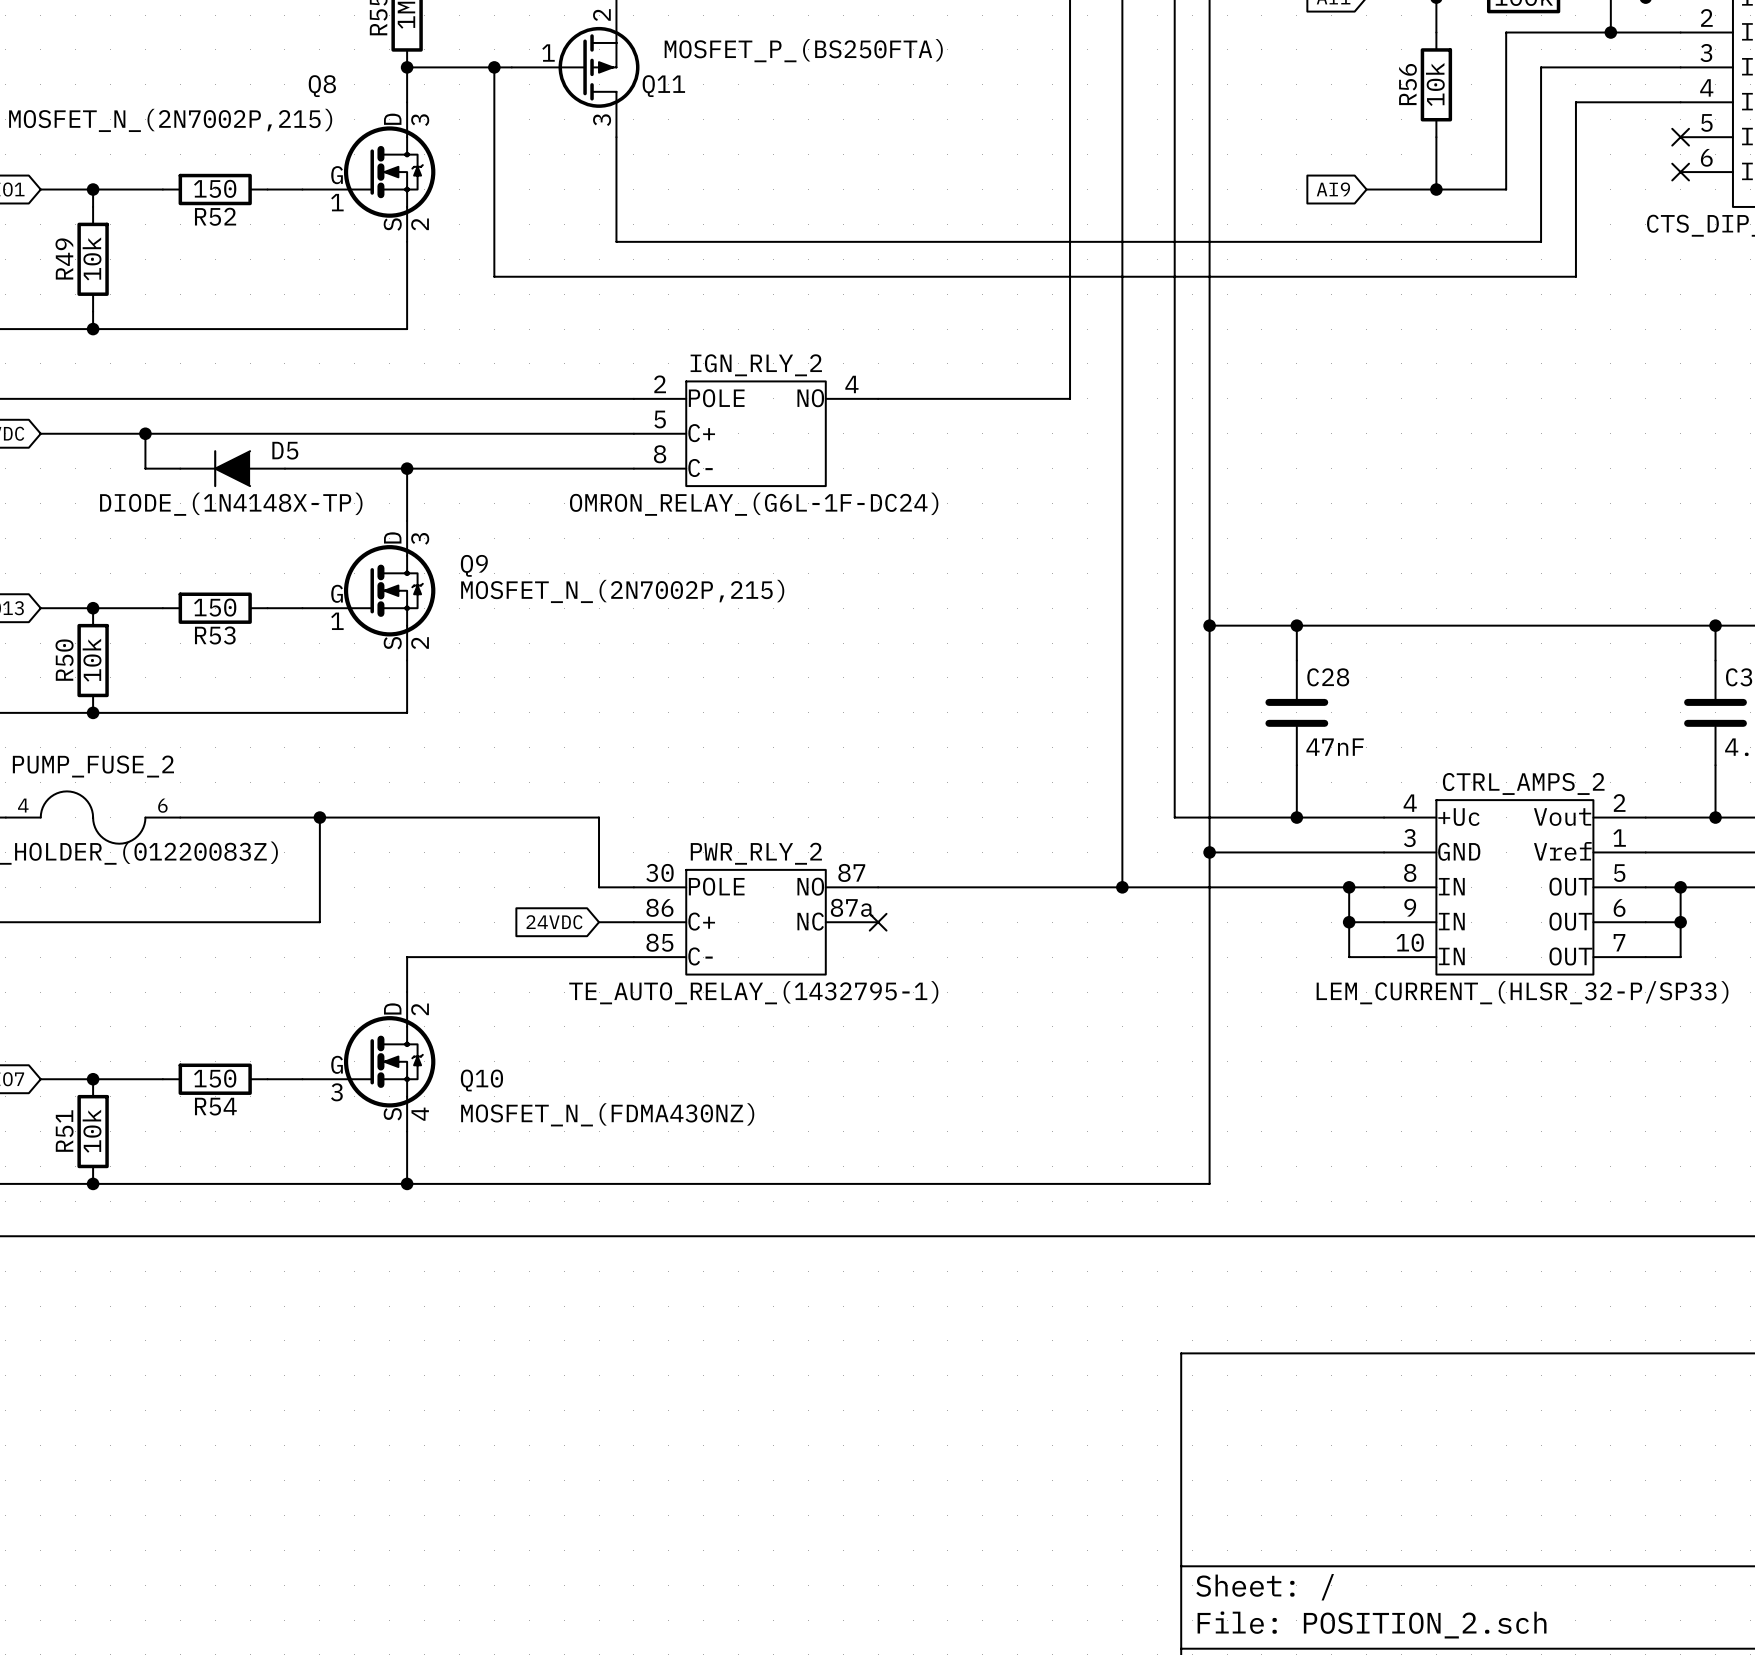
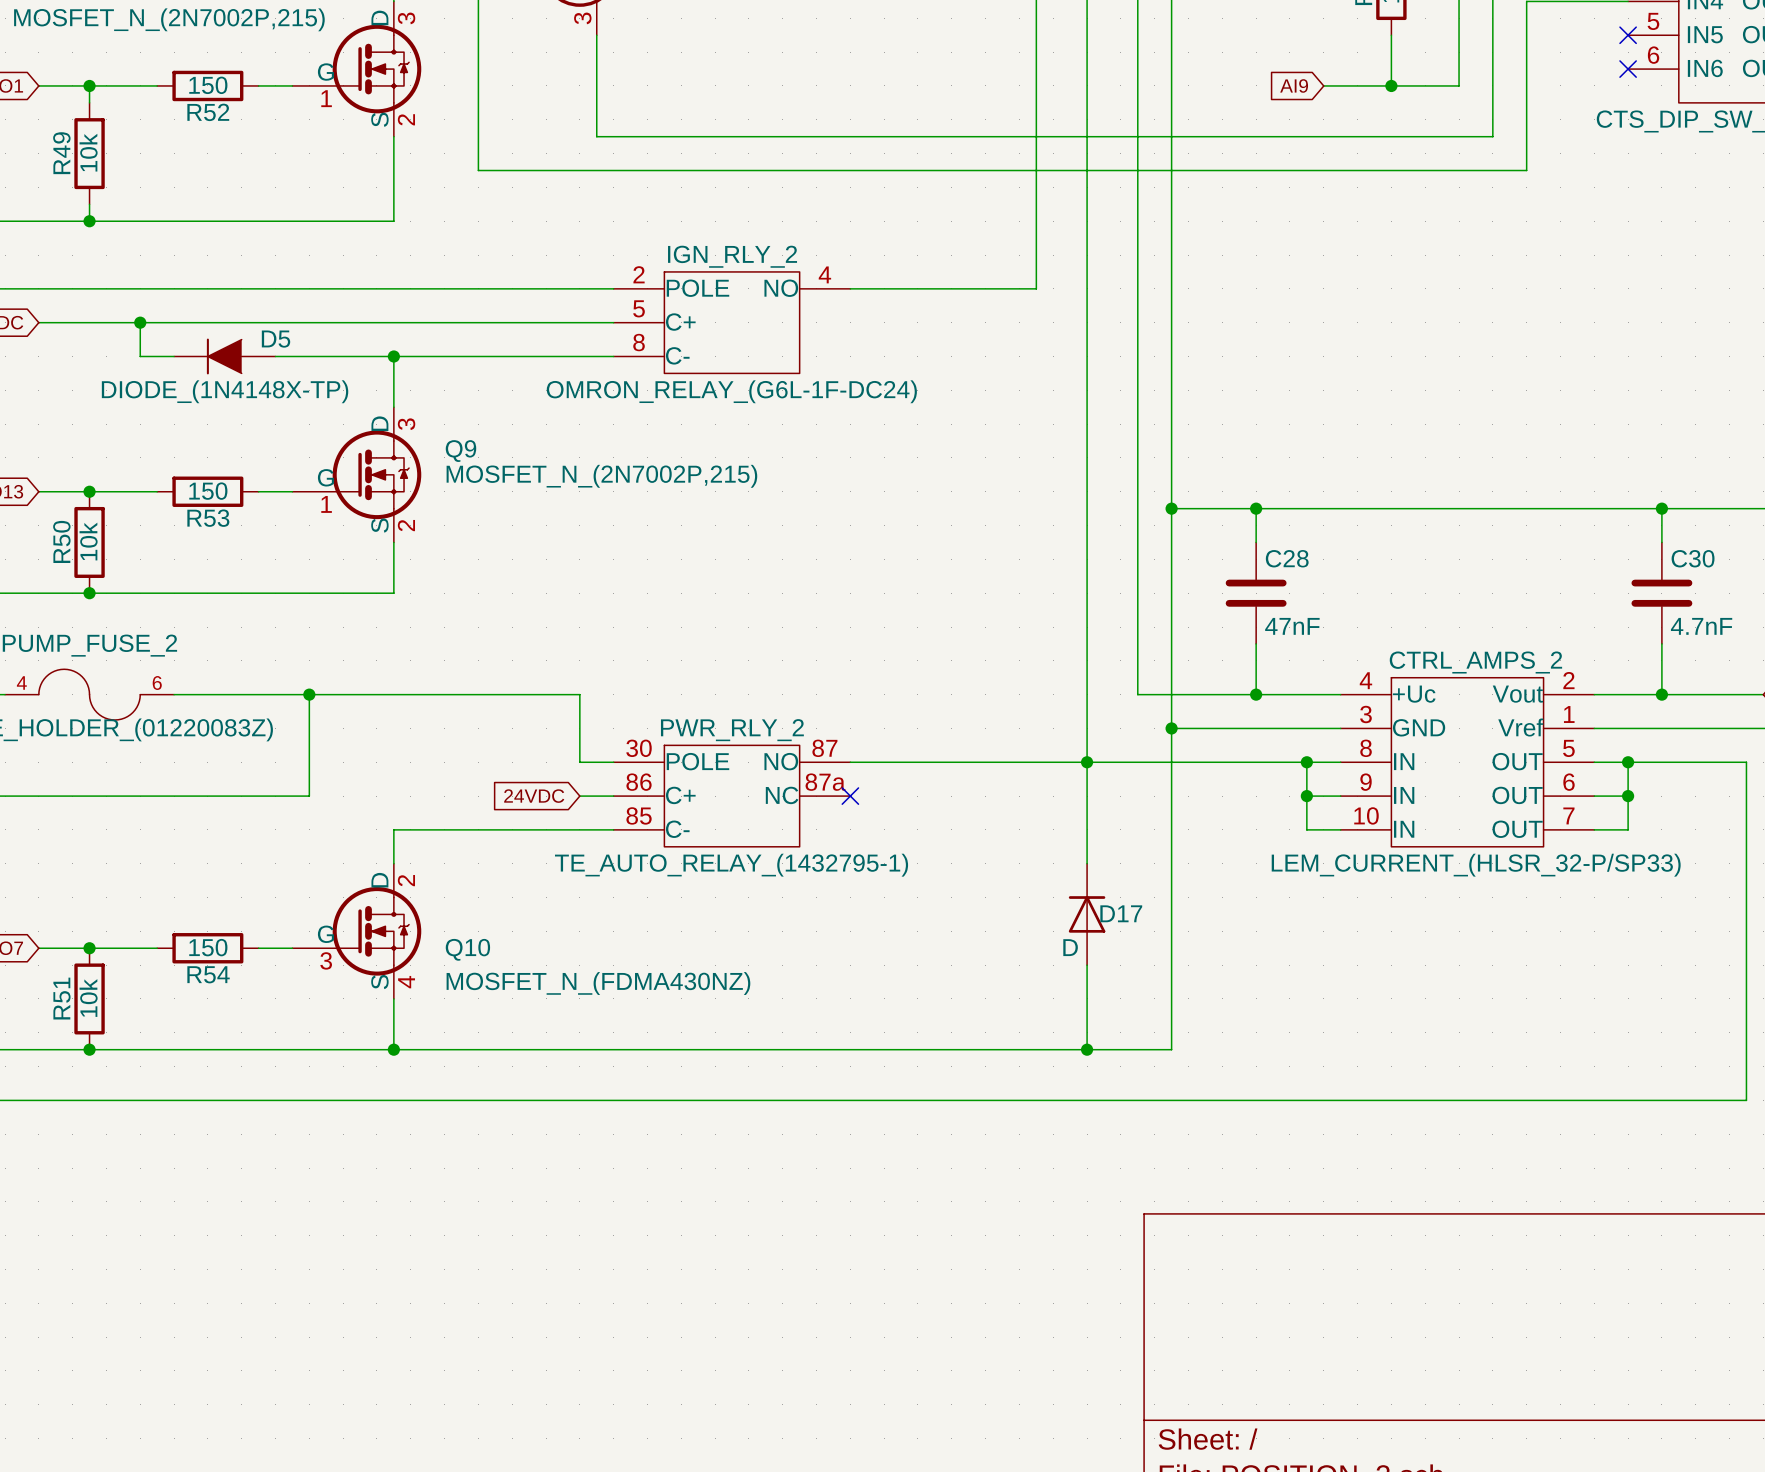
wire: none -> (1087, 762) (1087, 863)
D17: none -> D (1087, 914)
wire: none -> (1087, 965) (1087, 1049)
junction: none -> (1087, 1049)

